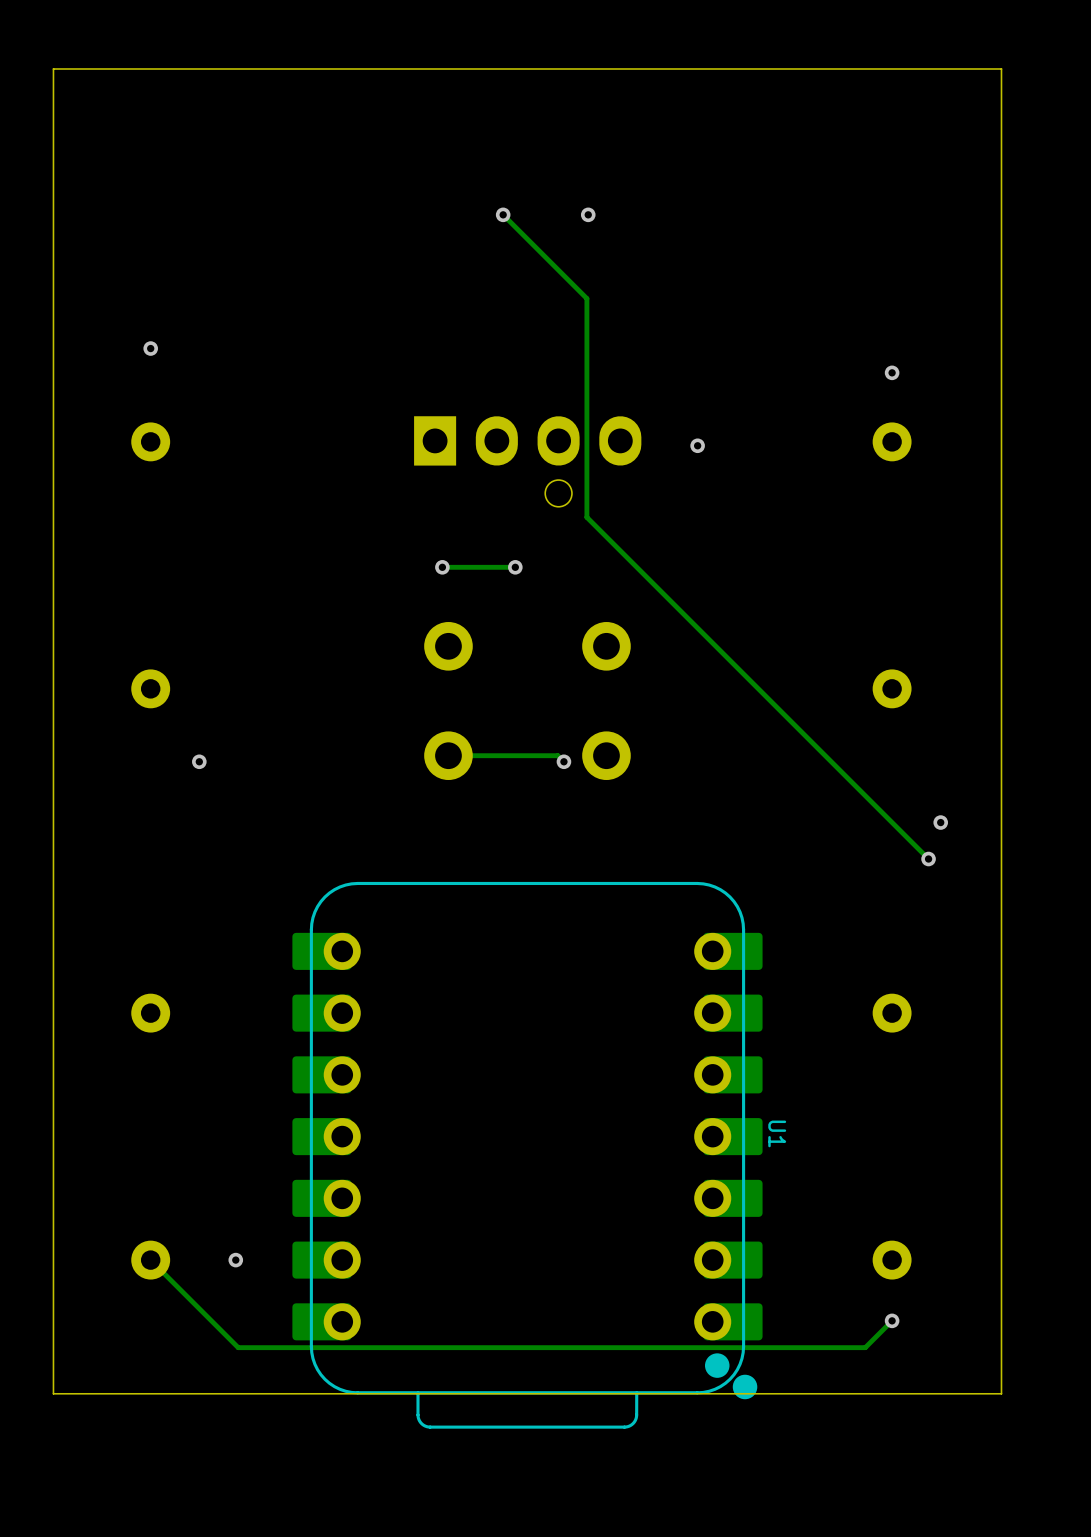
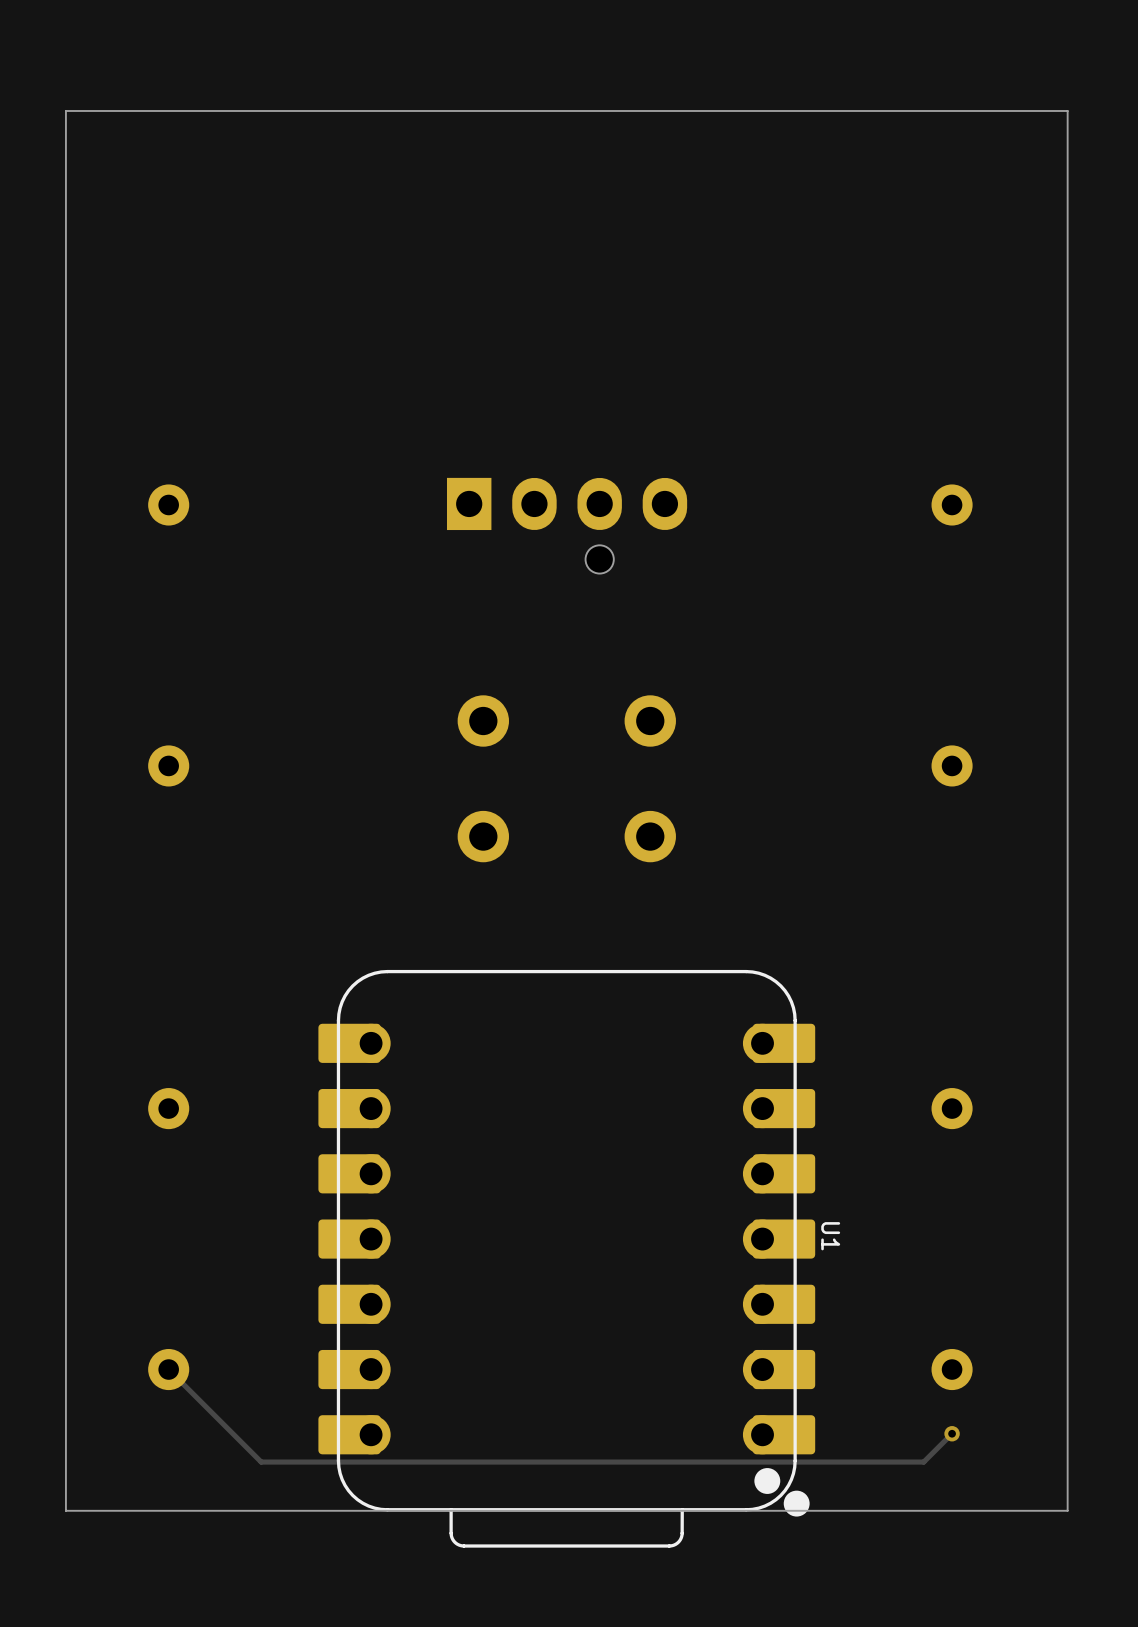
track: (503, 214) (586, 298) (586, 517) (928, 859) -> none
via: (503, 214) -> none
via: (588, 214) -> none
via: (150, 348) -> none
via: (892, 372) -> none
via: (697, 445) -> none
via: (442, 567) -> none
track: (515, 567) (442, 567) -> none
via: (515, 567) -> none
track: (448, 755) (557, 755) (563, 761) -> none
via: (199, 761) -> none
via: (563, 761) -> none
via: (940, 822) -> none
via: (928, 859) -> none
via: (235, 1260) -> none

